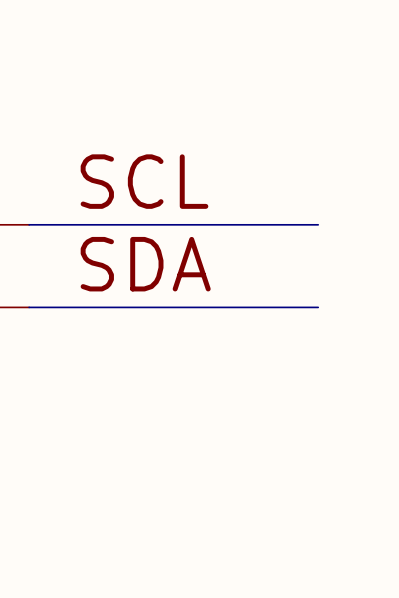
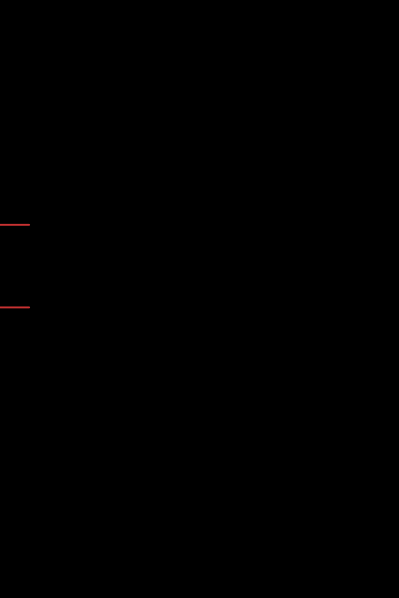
label: SCL (144, 181) -> none
wire: (29, 224) (318, 224) -> none
label: SDA (145, 264) -> none
wire: (29, 307) (318, 307) -> none

